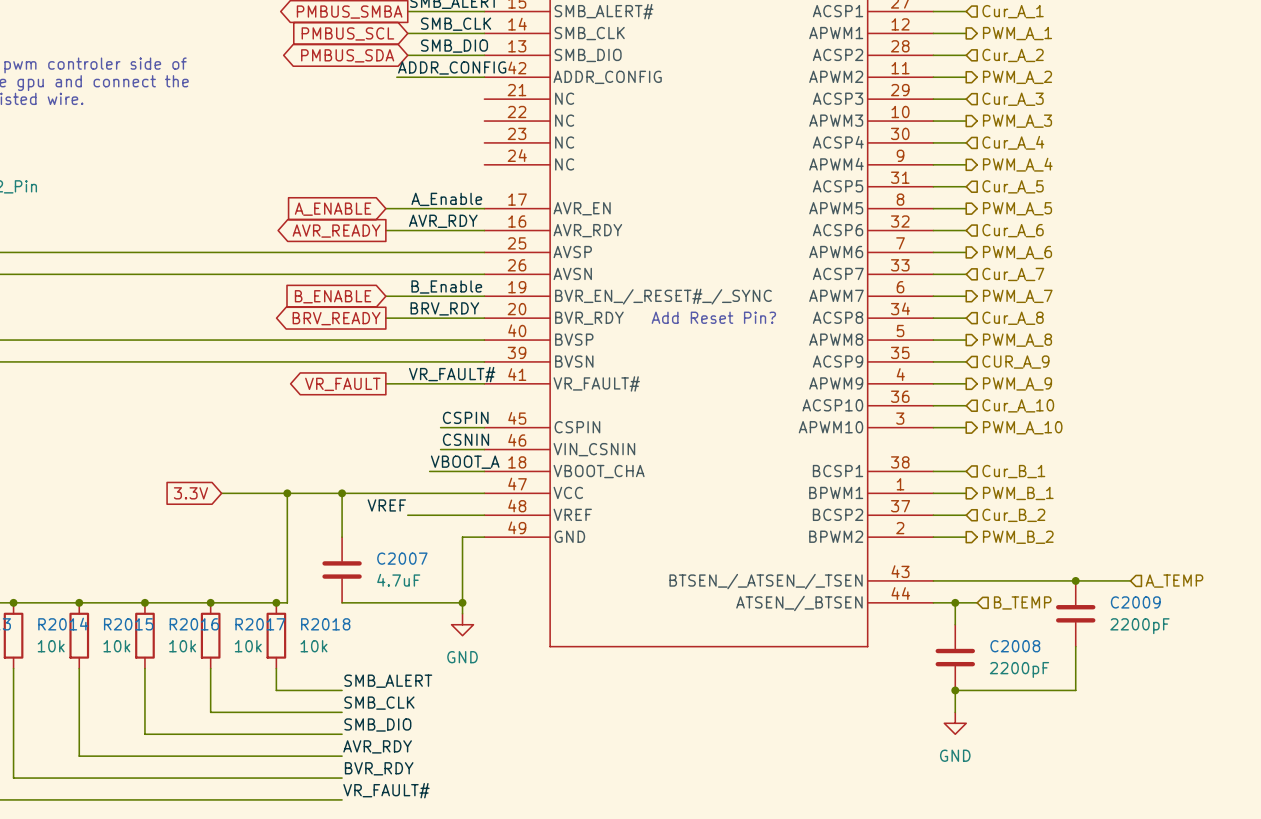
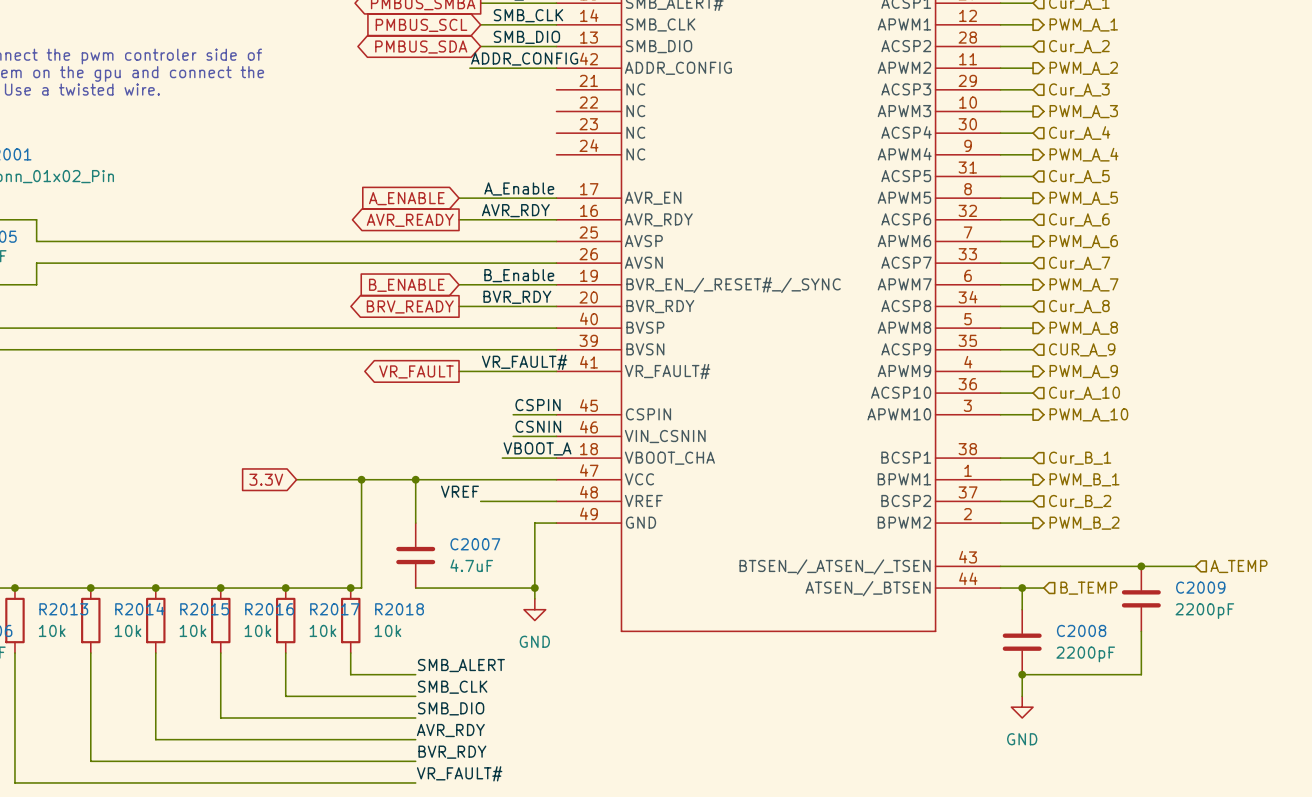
label: BRV_RDY (444, 308) -> BVR_RDY (517, 297)
text: Add Reset Pin? (713, 317) -> none

